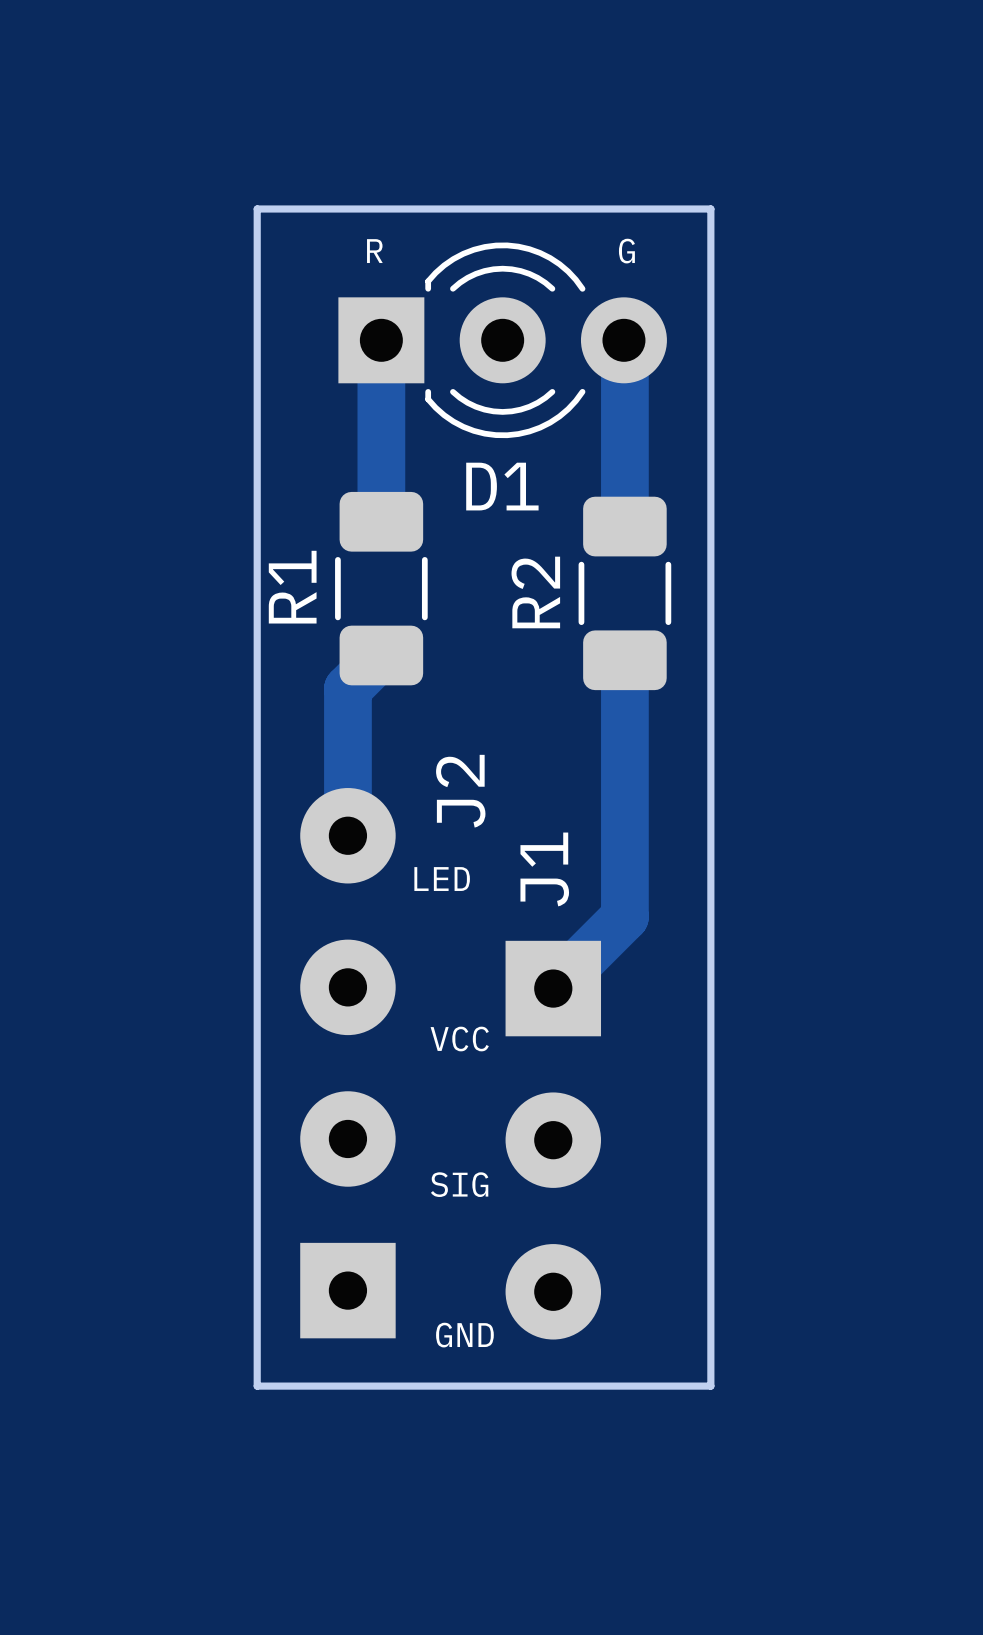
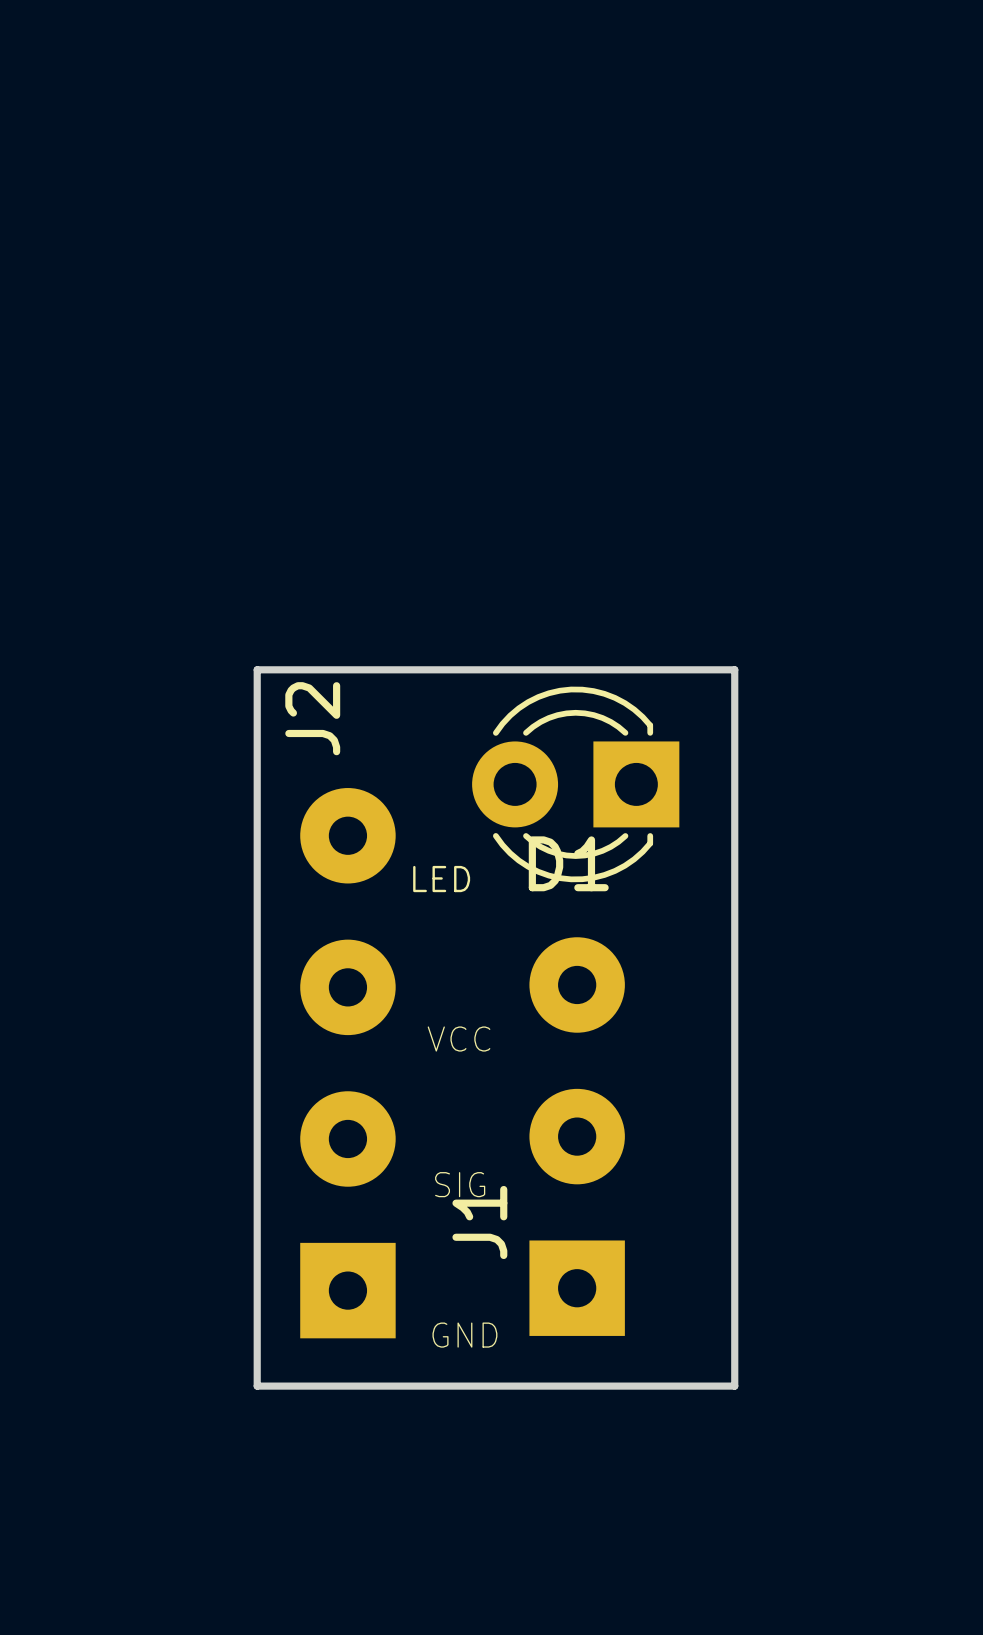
D1 footprint: [338, 242, 667, 439] -> [472, 686, 680, 883]
text: R (374, 251) -> none
text: G (626, 251) -> none
track: (381, 340) (381, 521) -> none
track: (623, 340) (624, 526) -> none
R1: (381, 588) -> none
R2: (624, 593) -> none
track: (381, 655) (347, 688) (347, 835) -> none
track: (624, 660) (624, 916) (553, 988) -> none
board edge: (257, 669) (257, 209) (710, 209) (710, 1386) -> (257, 669) (734, 669) (734, 1386) (710, 1386)
J2 name position: J2 (460, 791) -> J2 (312, 718)
J1 name position: J1 (544, 869) -> J1 (479, 1222)
J1 rotation: 0° (553, 1140) -> 180° (577, 1136)

